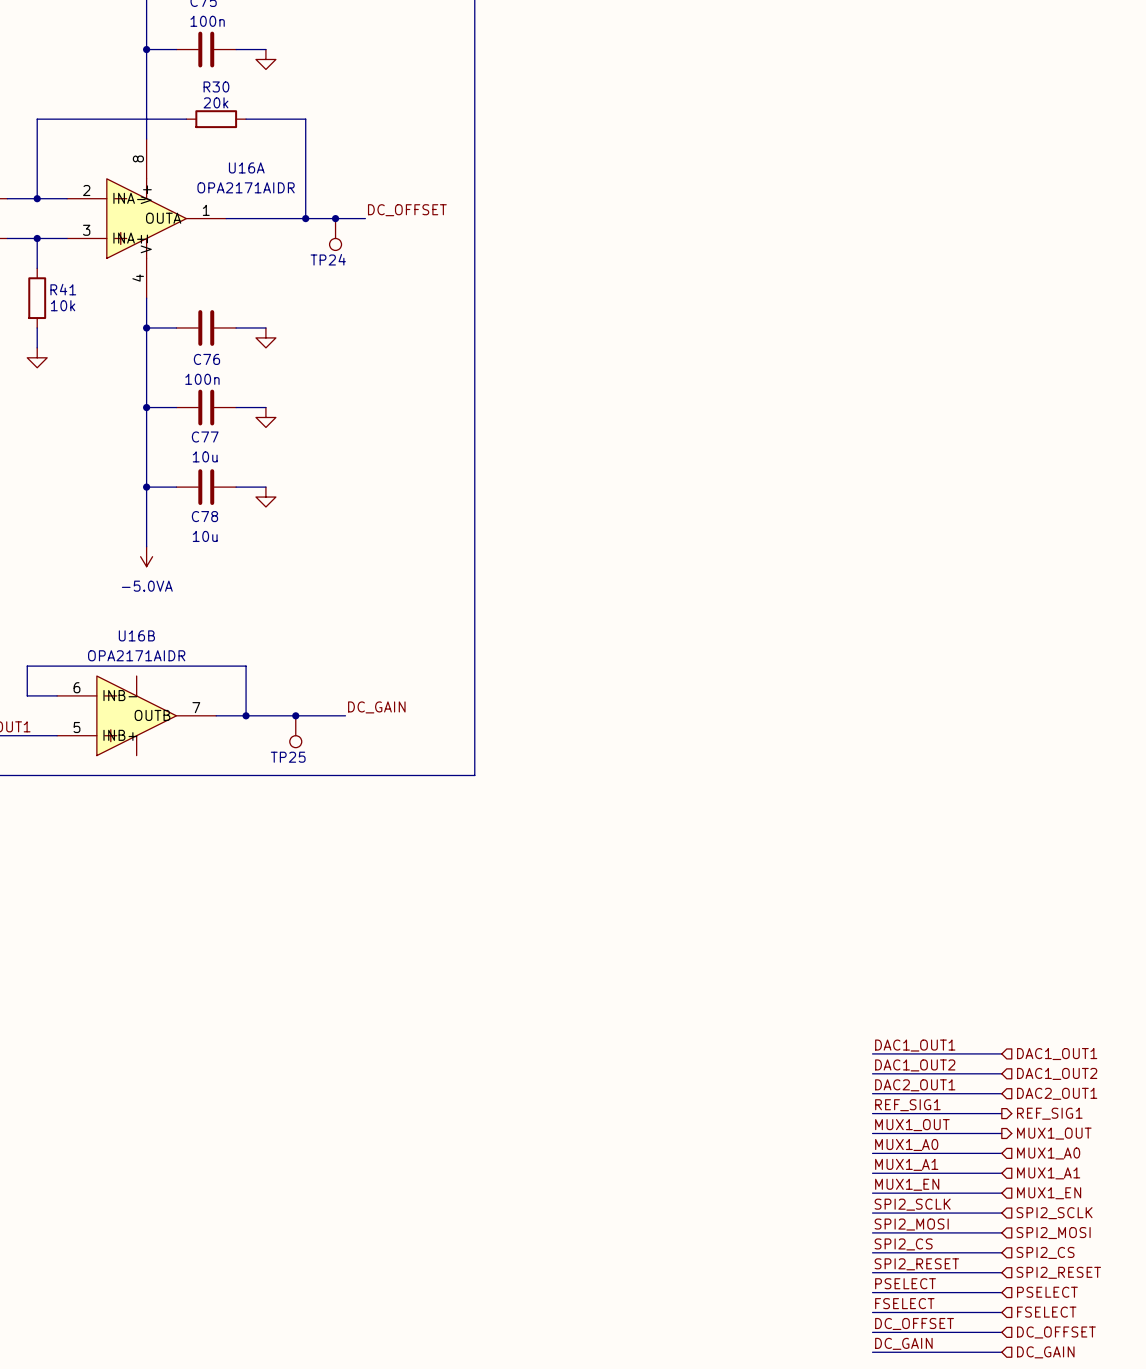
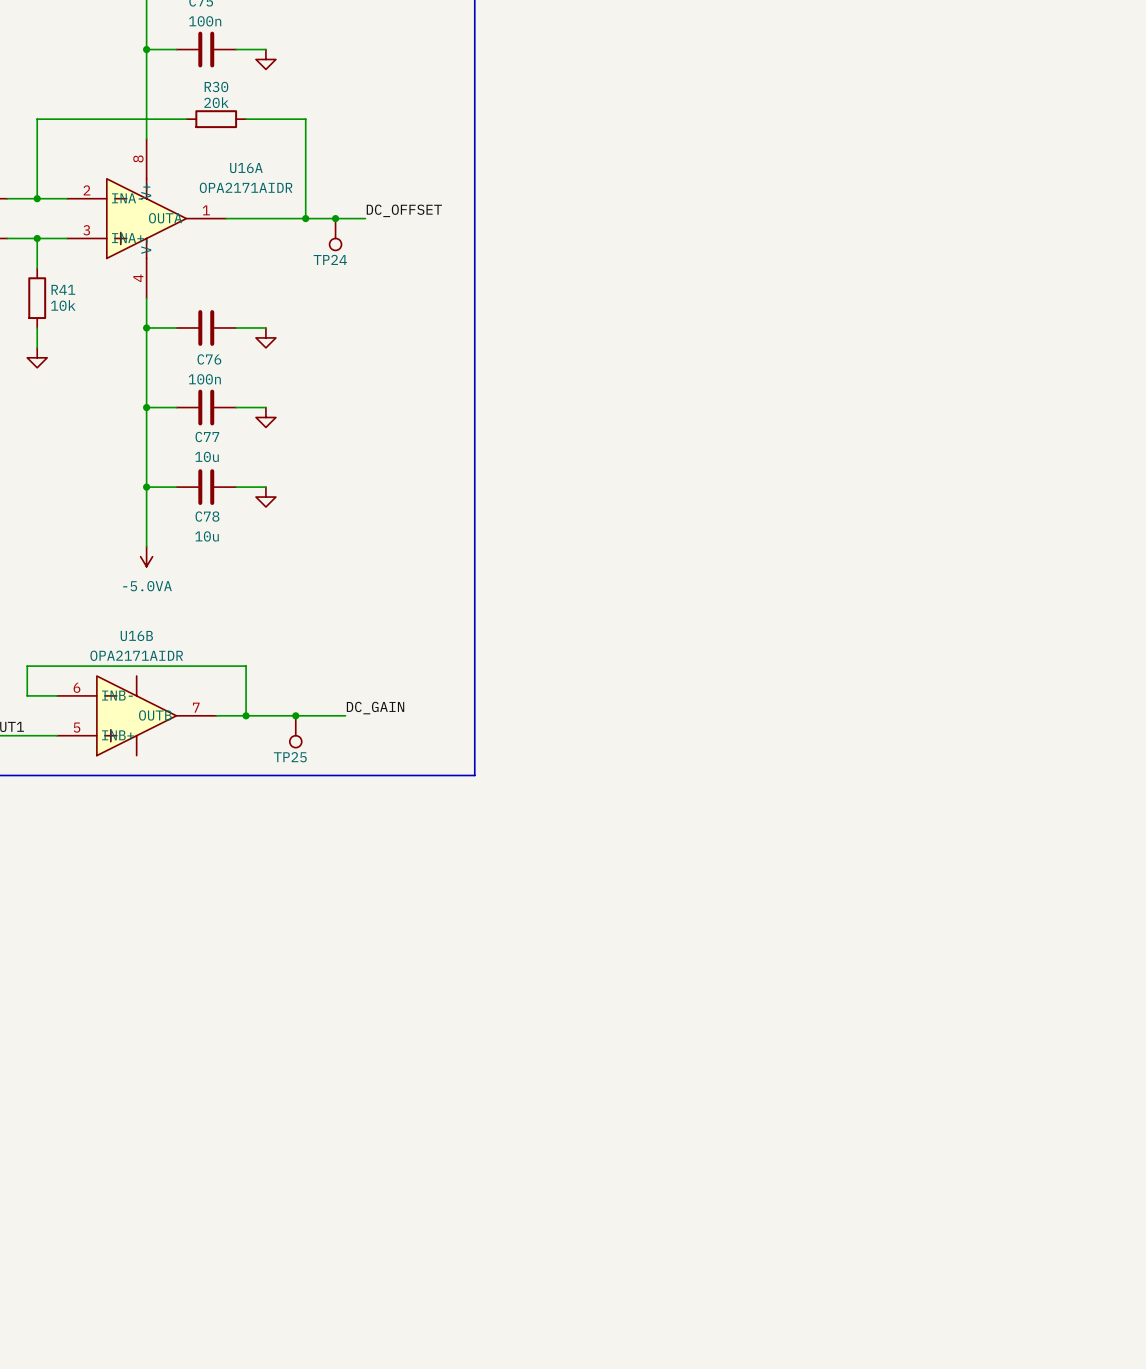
label: DAC1_OUT1 (915, 1045) -> none
wire: (872, 1053) (1001, 1053) -> none
hierarchical label: DAC1_OUT1 (1057, 1054) -> none
label: DAC1_OUT2 (915, 1065) -> none
wire: (872, 1073) (1001, 1073) -> none
hierarchical label: DAC1_OUT2 (1057, 1073) -> none
label: DAC2_OUT1 (915, 1085) -> none
wire: (872, 1093) (1001, 1093) -> none
hierarchical label: DAC2_OUT1 (1057, 1093) -> none
label: REF_SIG1 (907, 1105) -> none
wire: (872, 1113) (1001, 1113) -> none
hierarchical label: REF_SIG1 (1049, 1113) -> none
label: MUX1_OUT (912, 1125) -> none
wire: (872, 1133) (1001, 1133) -> none
hierarchical label: MUX1_OUT (1054, 1133) -> none
label: MUX1_A0 (906, 1144) -> none
wire: (872, 1153) (1001, 1153) -> none
hierarchical label: MUX1_A0 (1048, 1153) -> none
label: MUX1_A1 (906, 1164) -> none
wire: (872, 1173) (1001, 1173) -> none
hierarchical label: MUX1_A1 (1048, 1173) -> none
label: MUX1_EN (907, 1184) -> none
wire: (872, 1193) (1001, 1193) -> none
hierarchical label: MUX1_EN (1049, 1193) -> none
label: SPI2_SCLK (912, 1204) -> none
wire: (872, 1213) (1001, 1213) -> none
hierarchical label: SPI2_SCLK (1054, 1213) -> none
label: SPI2_MOSI (911, 1224) -> none
wire: (872, 1232) (1001, 1232) -> none
hierarchical label: SPI2_MOSI (1053, 1233) -> none
label: SPI2_CS (903, 1244) -> none
wire: (872, 1252) (1001, 1252) -> none
hierarchical label: SPI2_CS (1045, 1252) -> none
label: SPI2_RESET (916, 1264) -> none
wire: (872, 1272) (1001, 1272) -> none
hierarchical label: SPI2_RESET (1058, 1272) -> none
label: PSELECT (905, 1283) -> none
wire: (872, 1292) (1001, 1292) -> none
hierarchical label: PSELECT (1047, 1292) -> none
label: FSELECT (904, 1303) -> none
wire: (872, 1312) (1001, 1312) -> none
hierarchical label: FSELECT (1046, 1312) -> none
label: DC_OFFSET (914, 1323) -> none
wire: (872, 1332) (1001, 1332) -> none
hierarchical label: DC_OFFSET (1056, 1332) -> none
label: DC_GAIN (903, 1343) -> none
wire: (872, 1352) (1001, 1352) -> none
hierarchical label: DC_GAIN (1045, 1352) -> none

